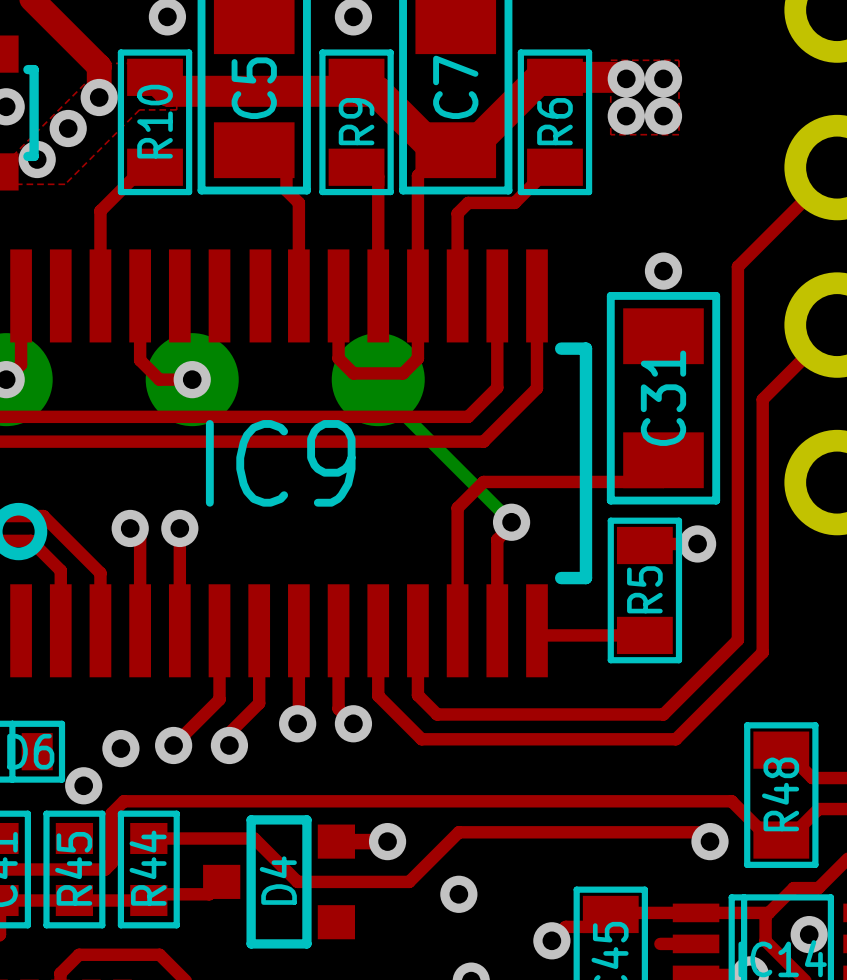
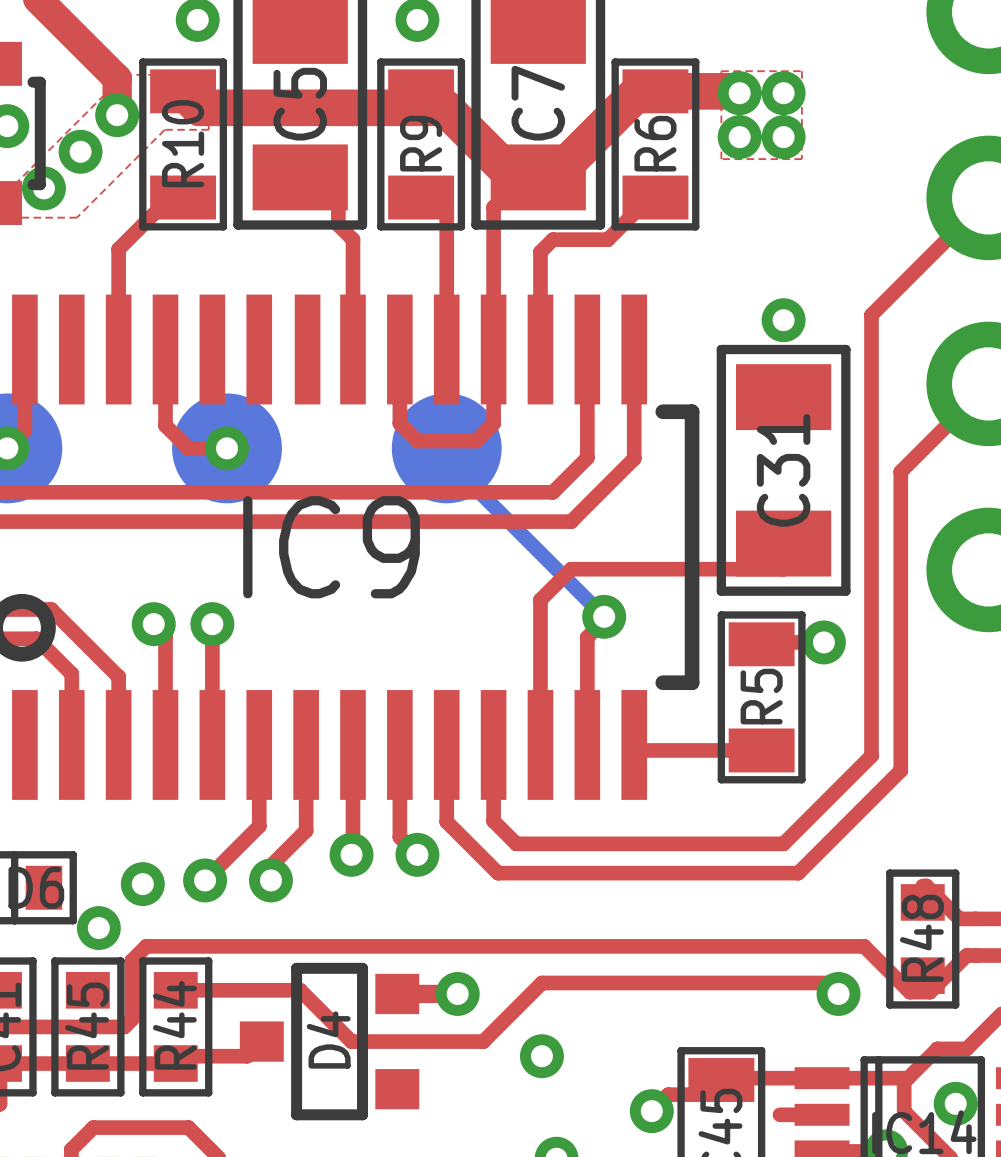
R48 footprint: [744, 722, 819, 868] -> [886, 869, 960, 1009]

